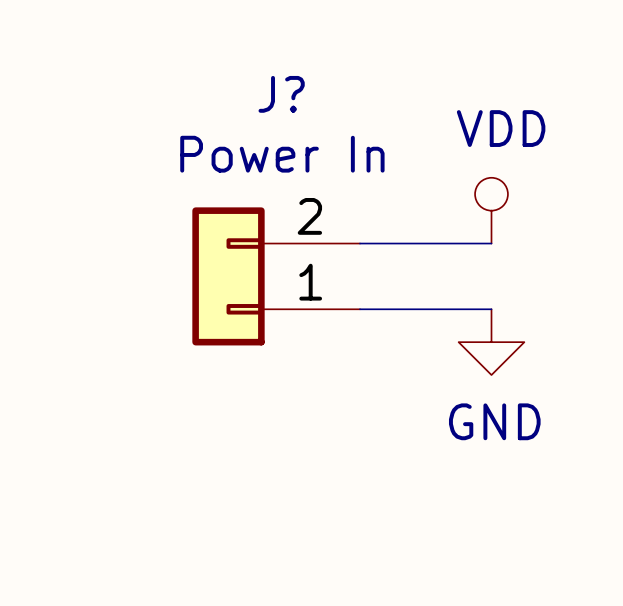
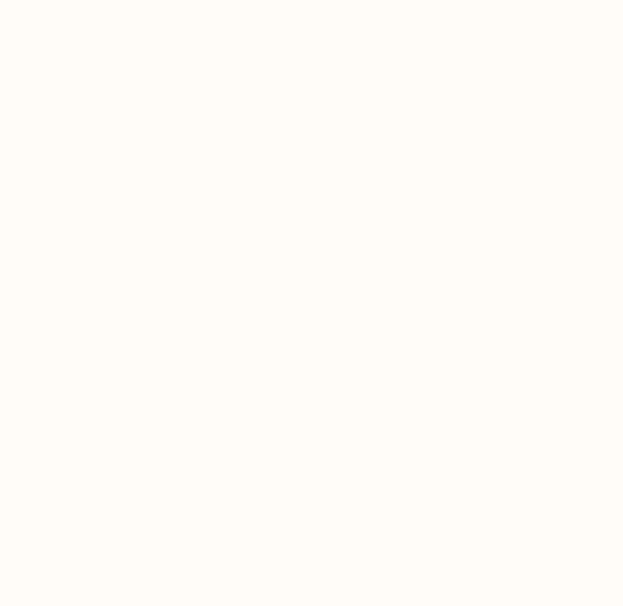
power symbol: VDD (491, 210) -> none
wire: (359, 243) (491, 243) -> none
J?: Power In (276, 276) -> none
wire: (359, 309) (491, 309) -> none
power symbol: GND (491, 342) -> none

